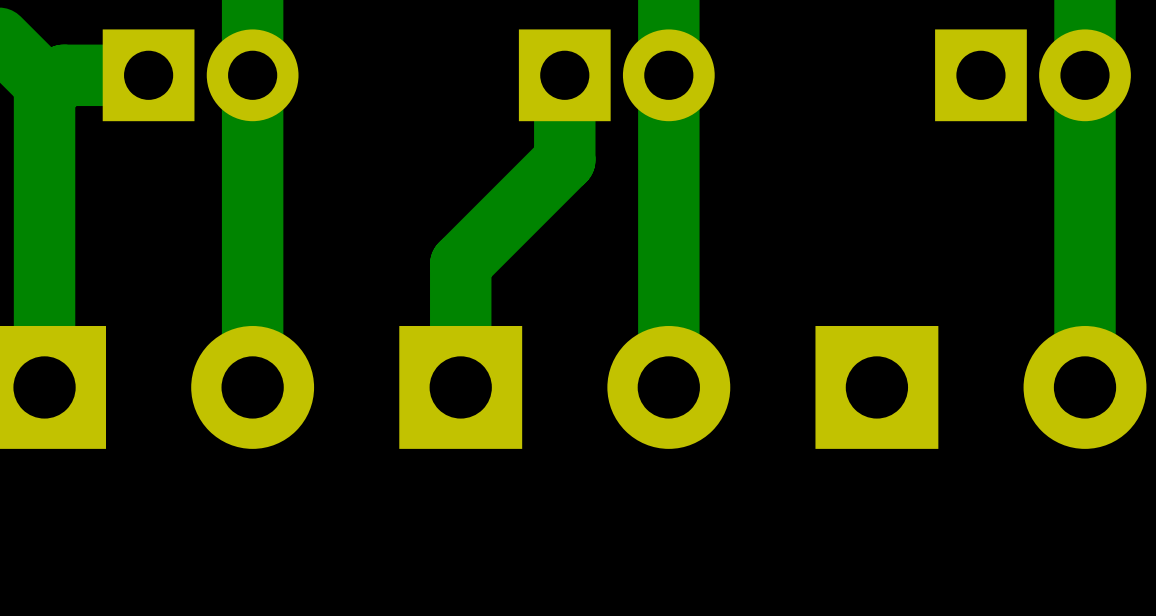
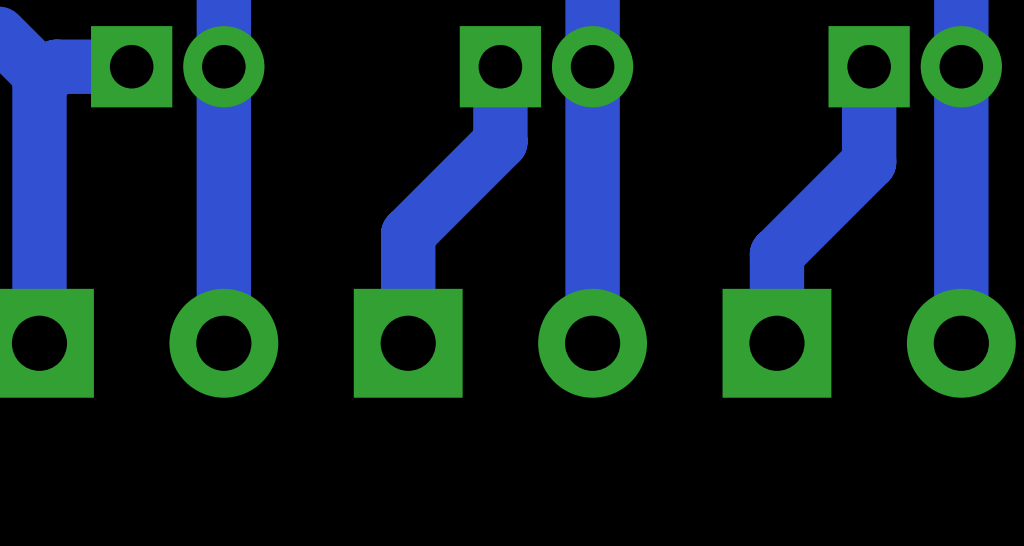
track: none -> (869, 66) (869, 162) (776, 254) (776, 343)

